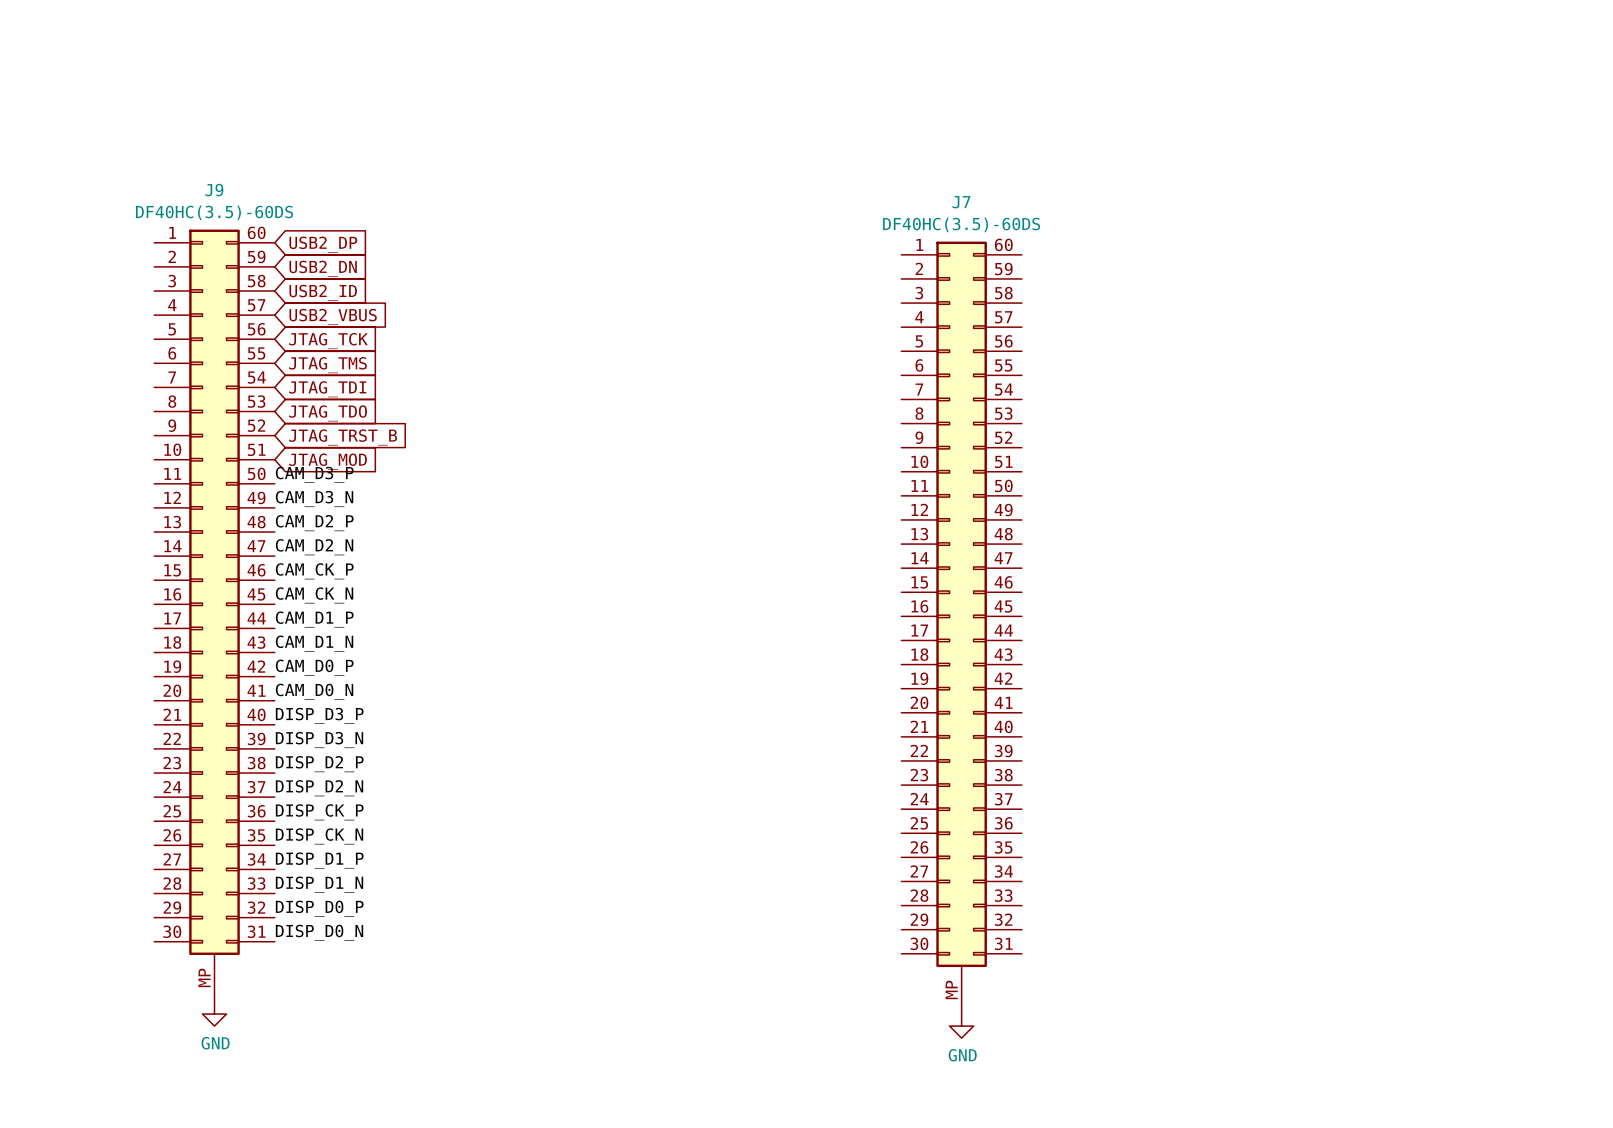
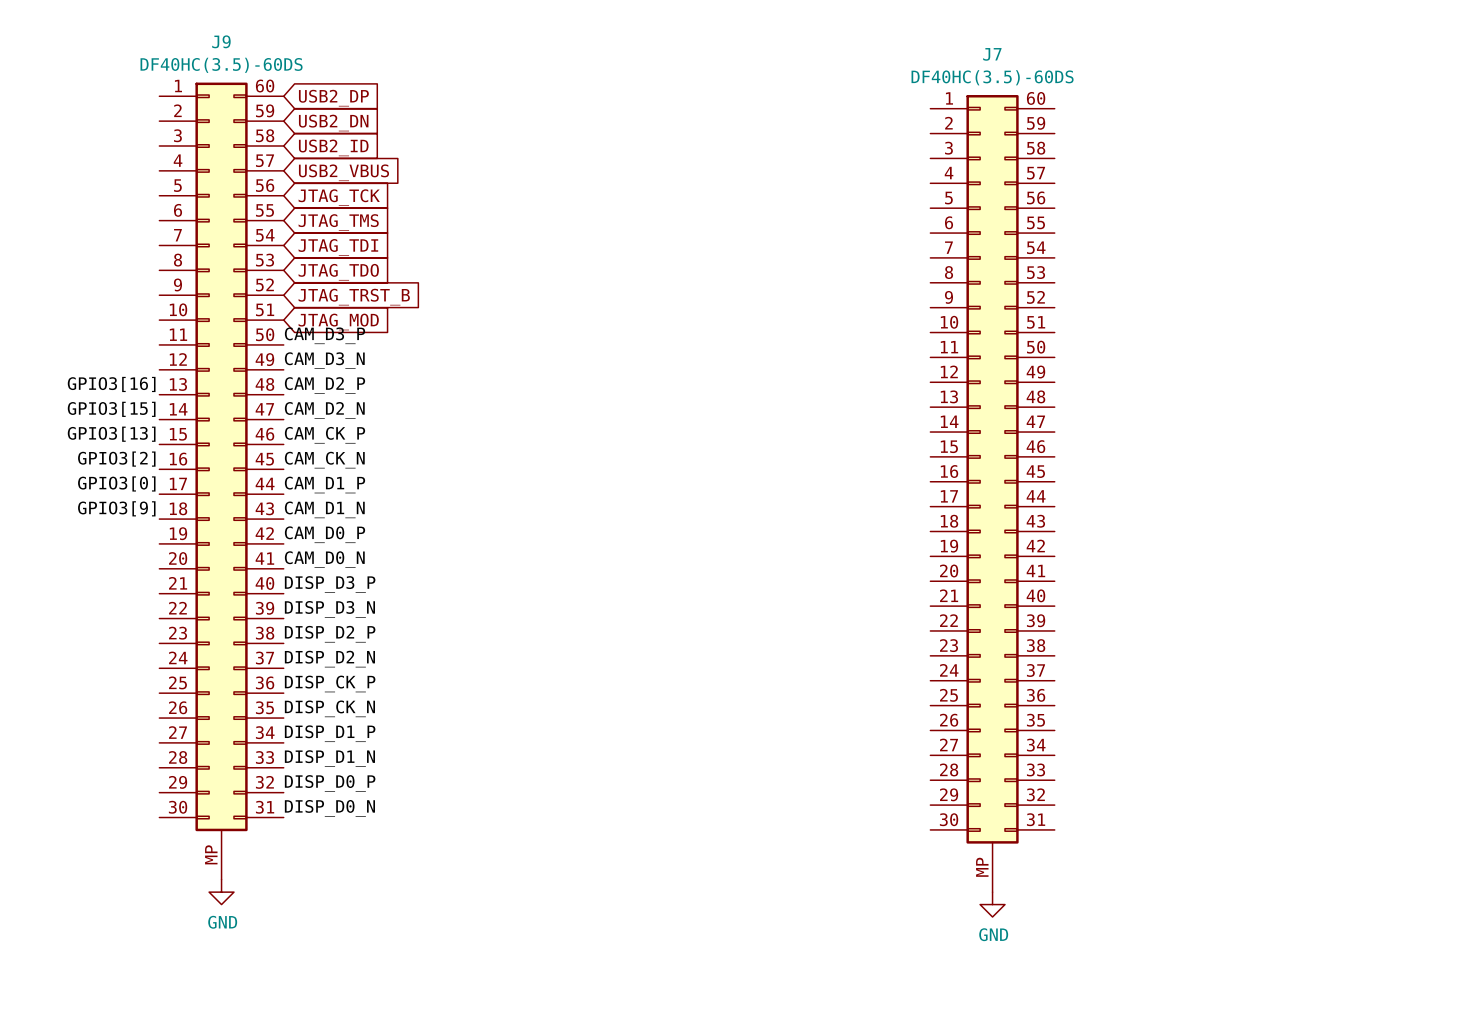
label: none -> GPIO3[16] (111, 384)
label: none -> GPIO3[15] (111, 409)
label: none -> GPIO3[13] (111, 434)
label: none -> GPIO3[2] (116, 459)
label: none -> GPIO3[0] (116, 483)
label: none -> GPIO3[9] (116, 508)

